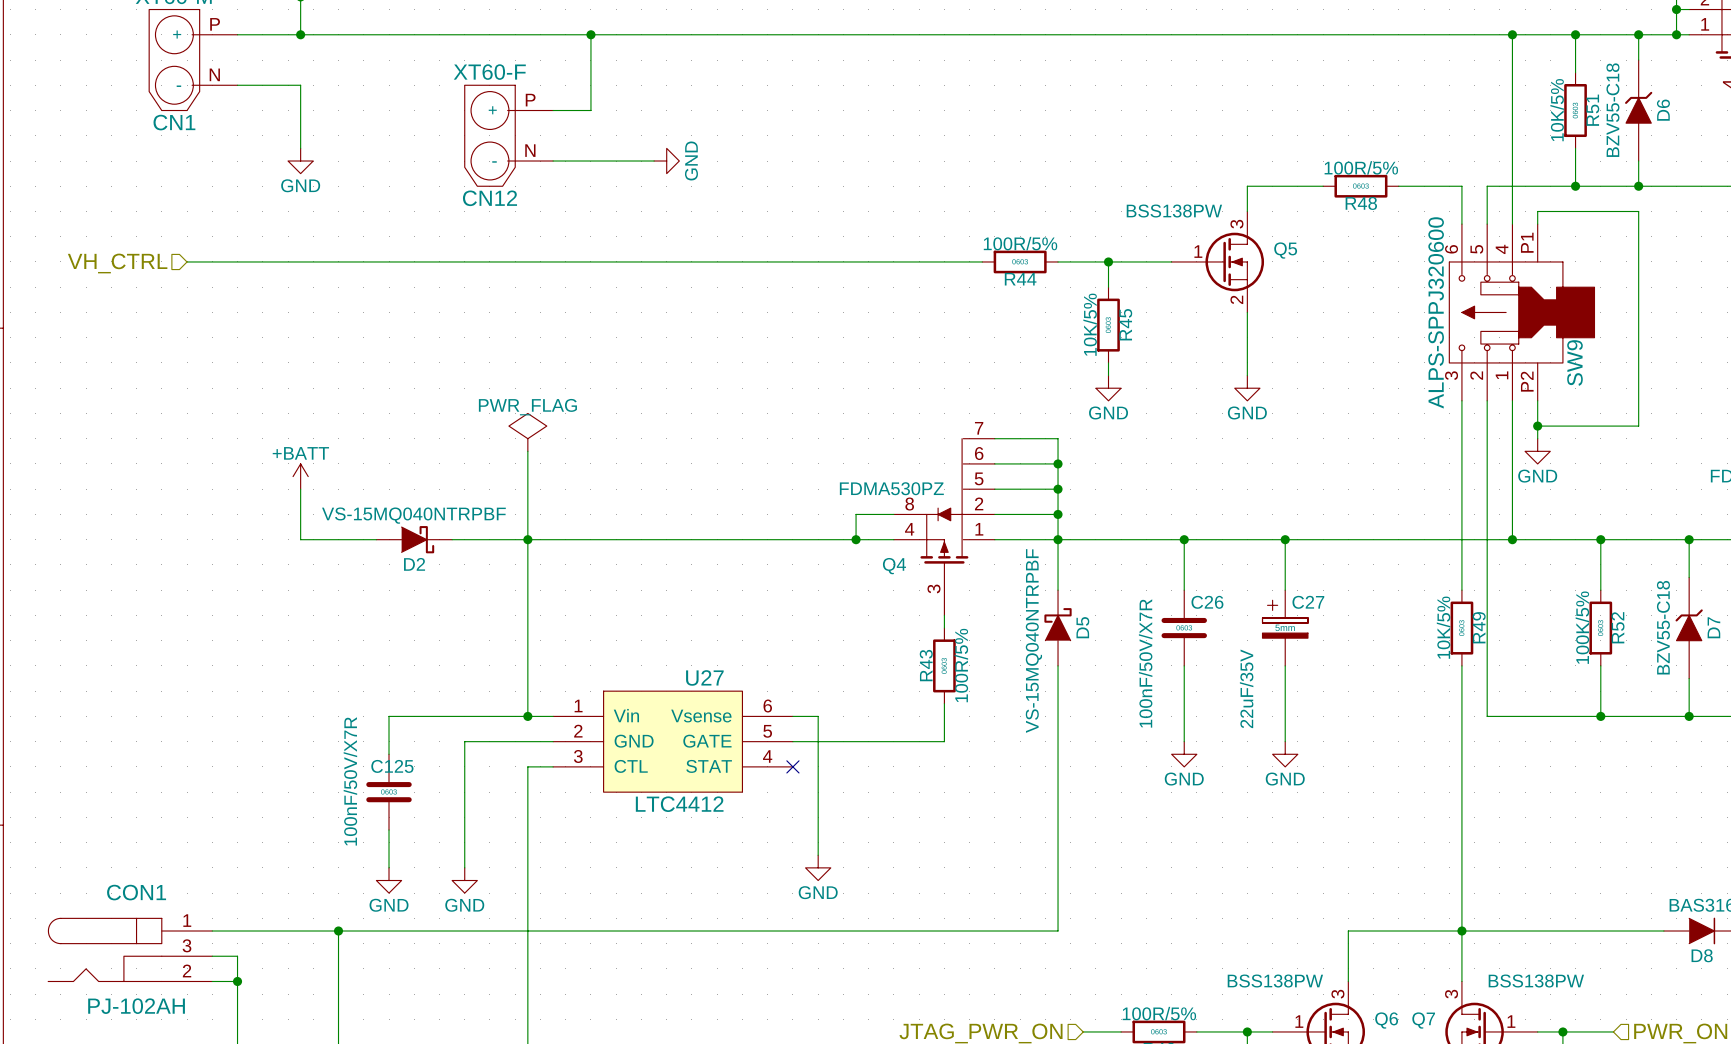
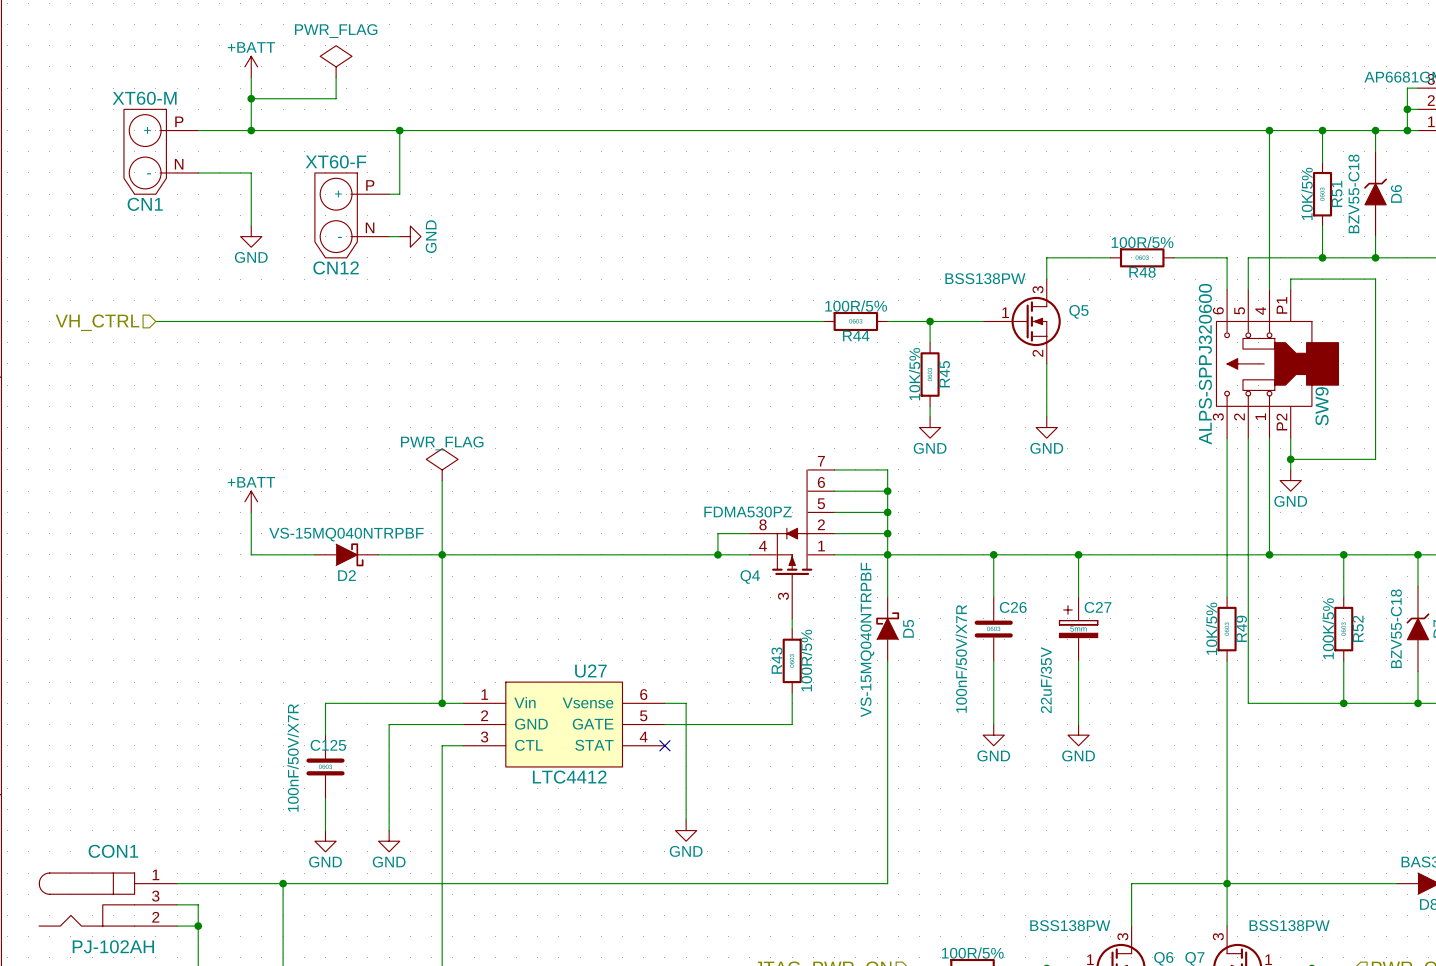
wire: none -> (399, 130) (399, 194) (389, 194)
junction: none -> (399, 130)
wire: (590, 34) (590, 110) (553, 110) -> none
junction: (590, 34) -> none
CN12 position: (508, 135) -> (352, 215)
wire: none -> (389, 236) (399, 236)
wire: (553, 161) (654, 161) -> none
power symbol position: GND (666, 161) -> GND (410, 236)

